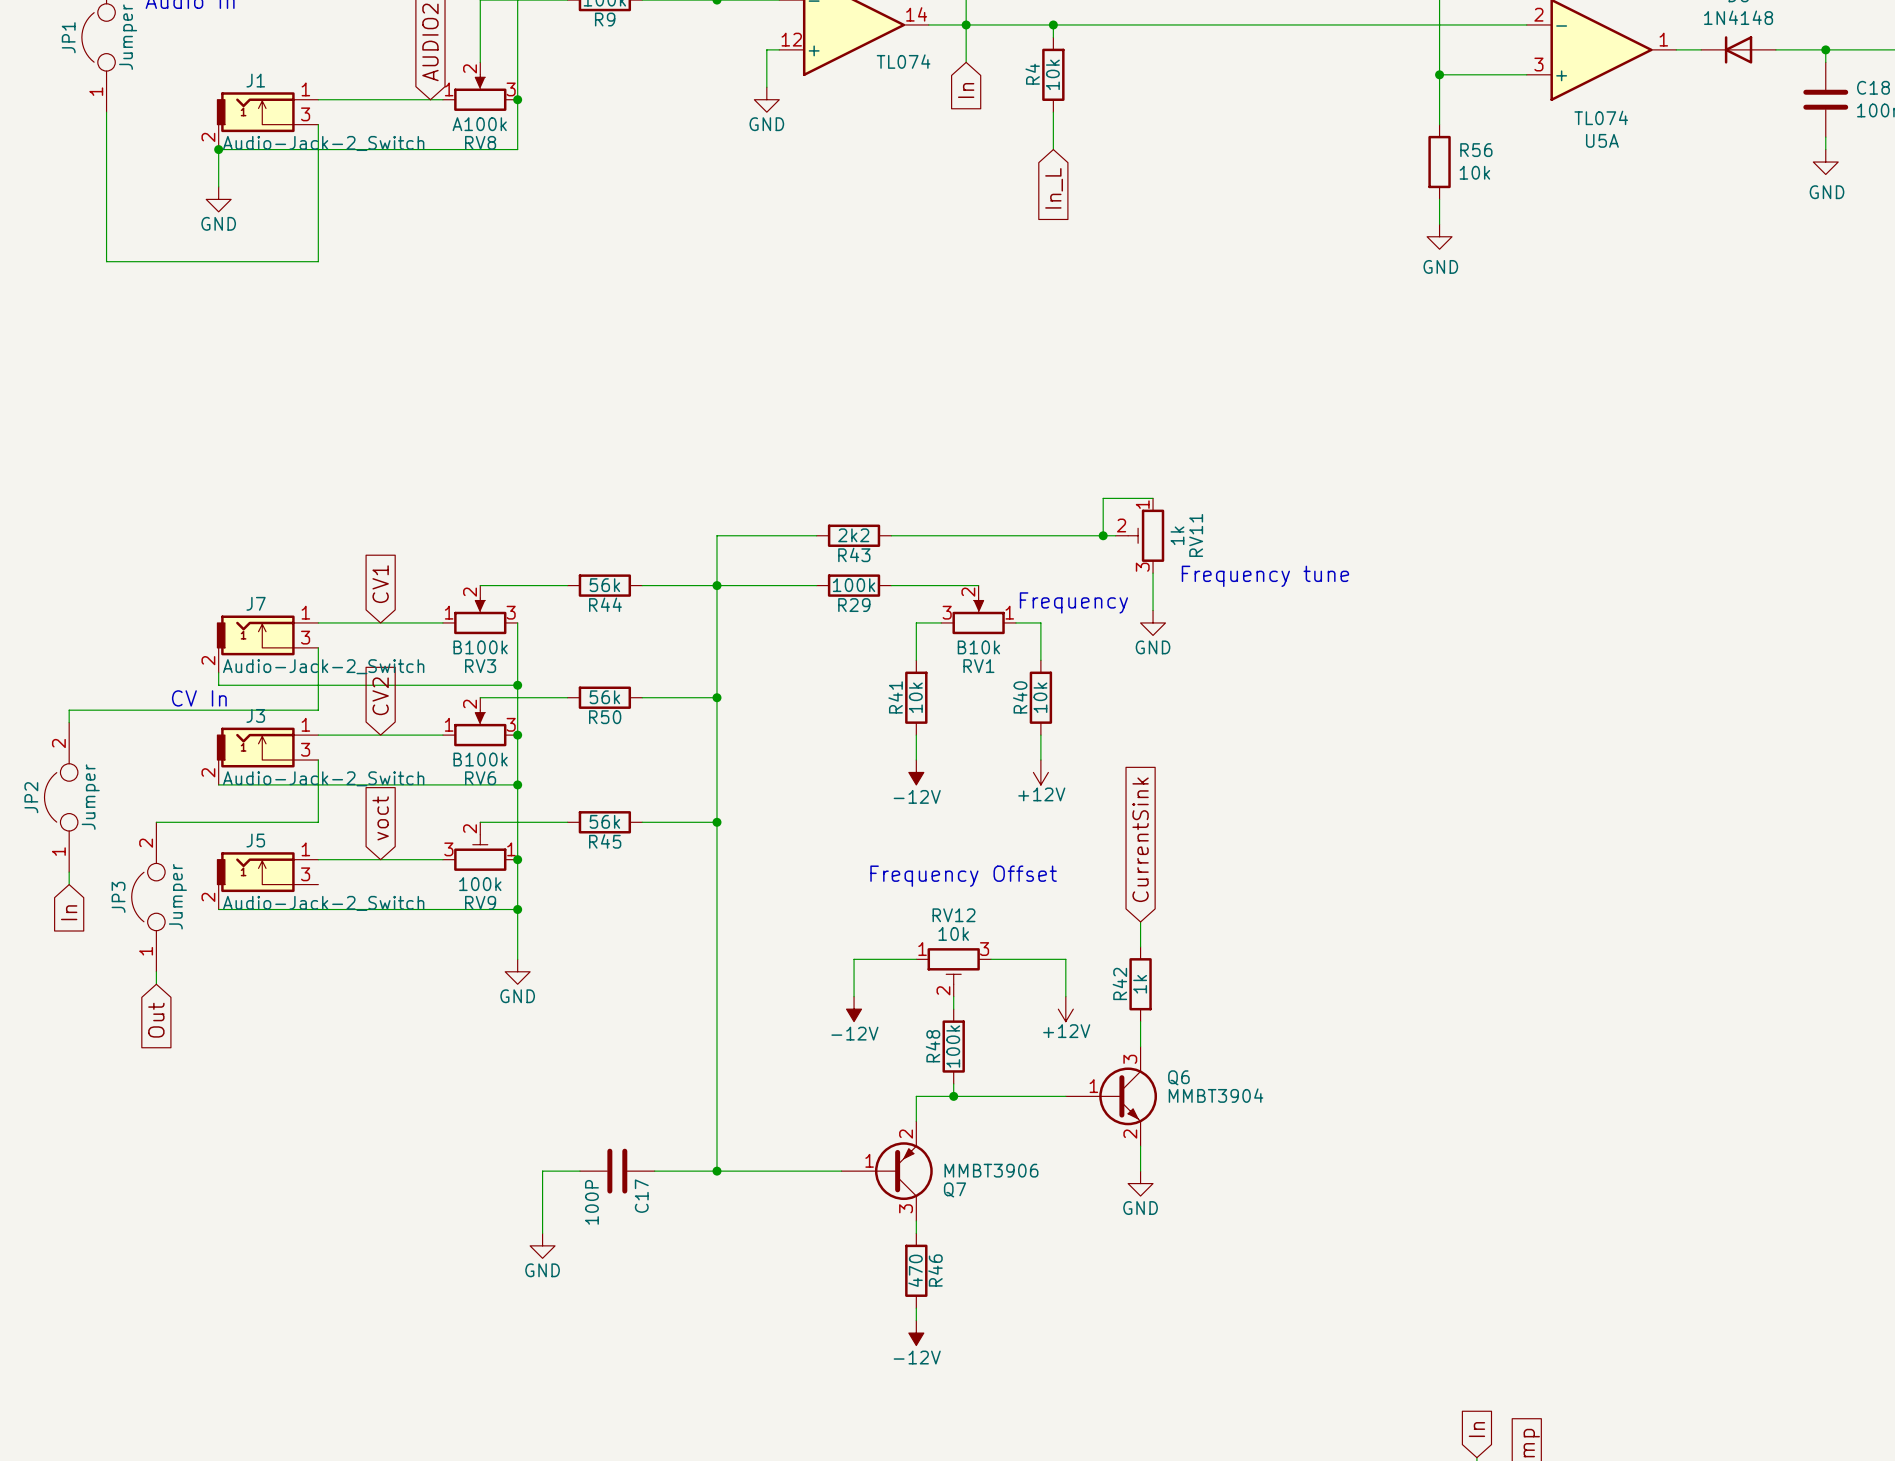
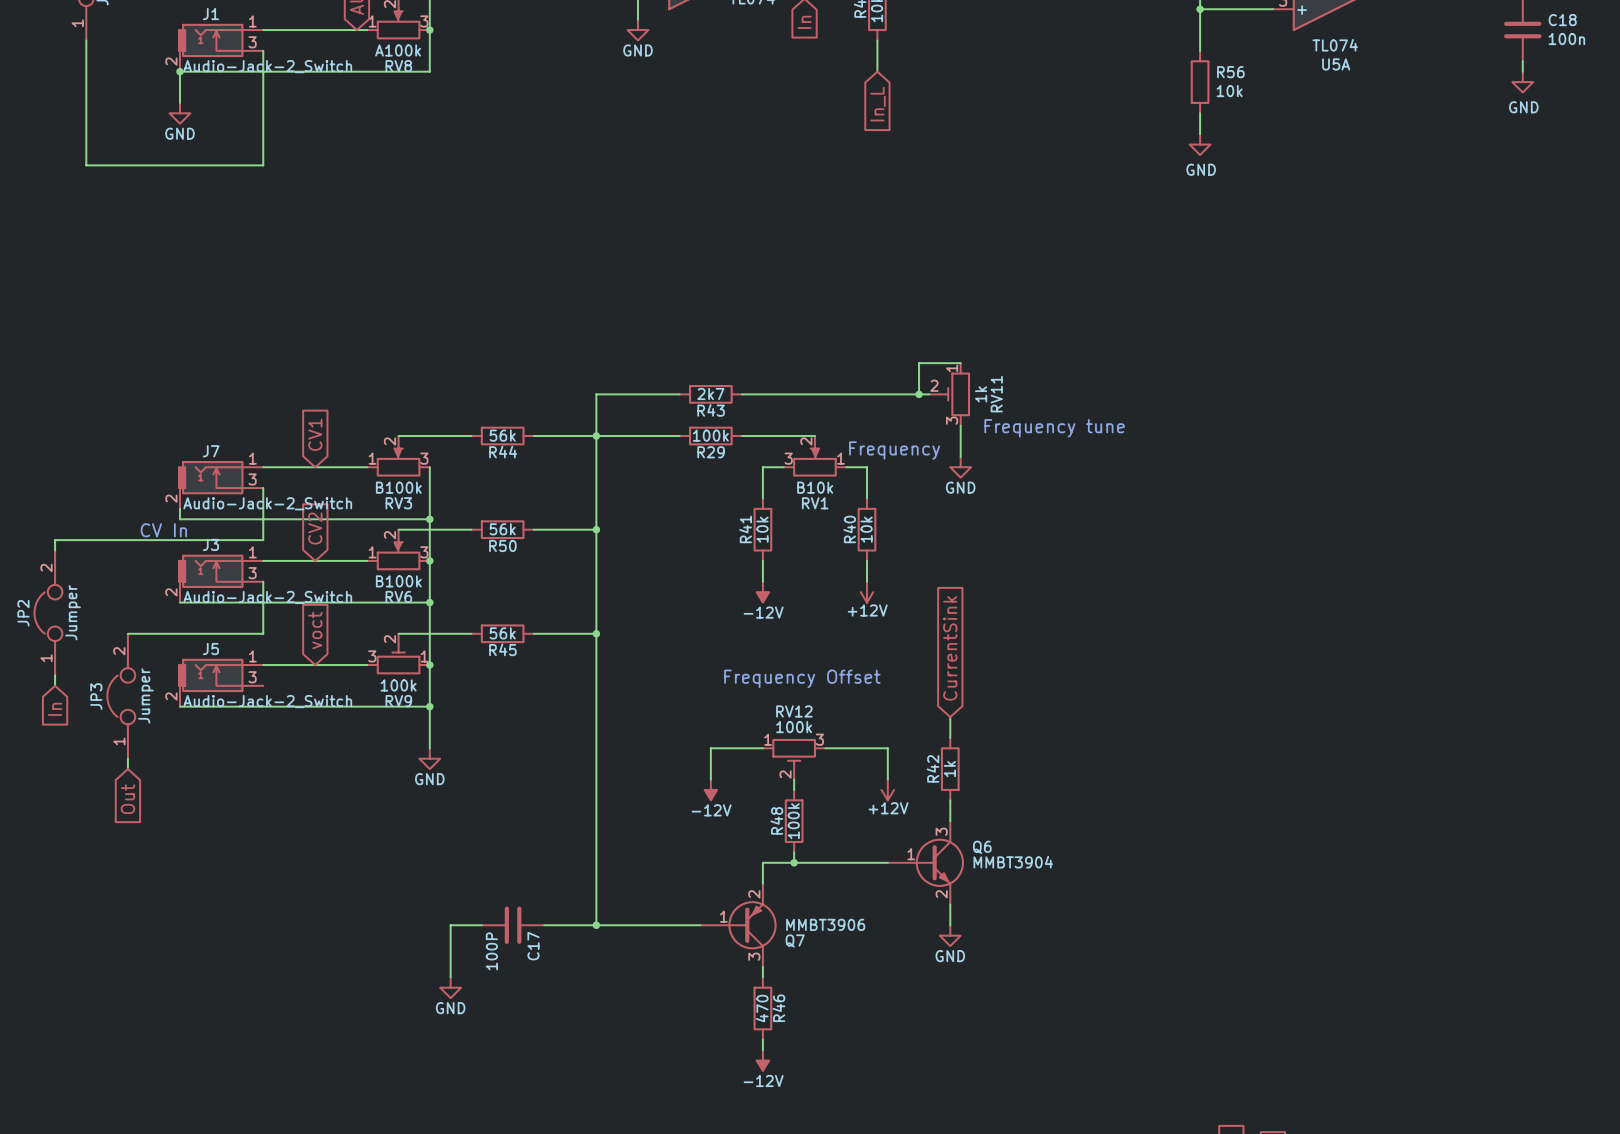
R43 value: 2k2 (853, 535) -> 2k7 (710, 393)
RV12 value: 10k (953, 933) -> 100k (794, 727)

